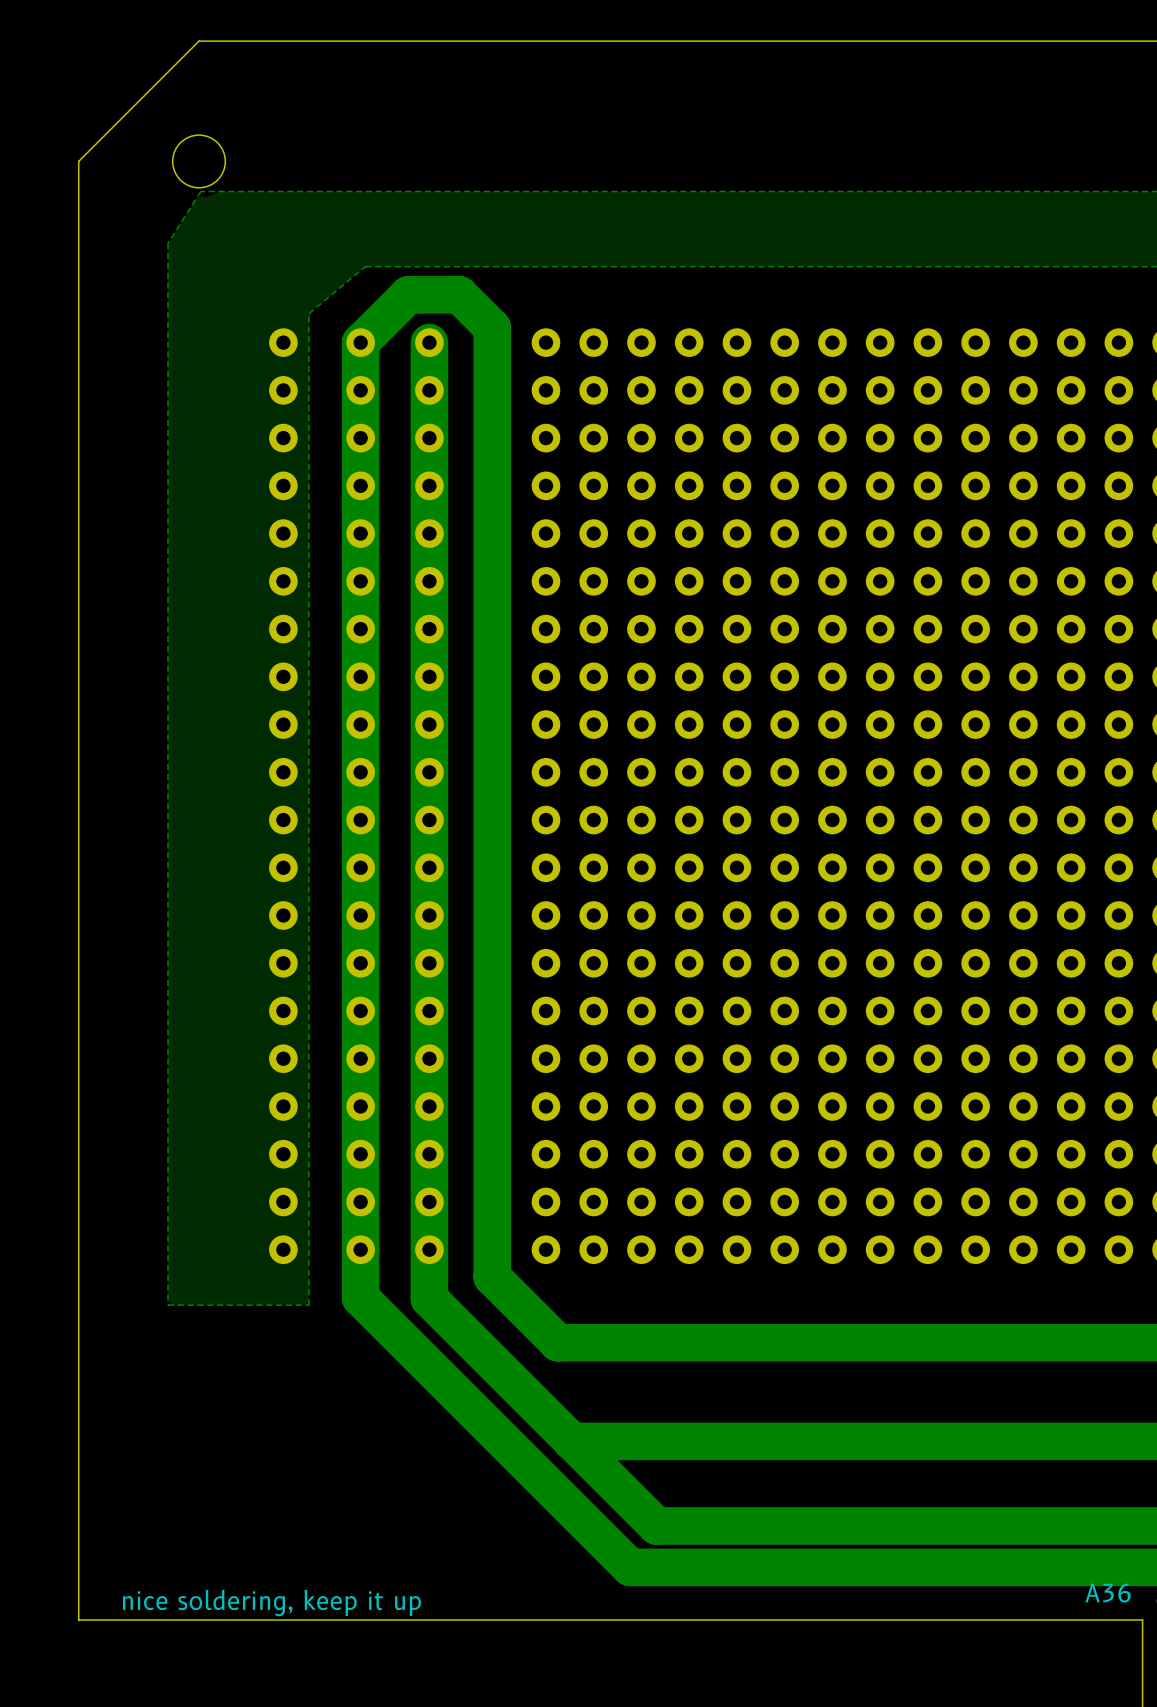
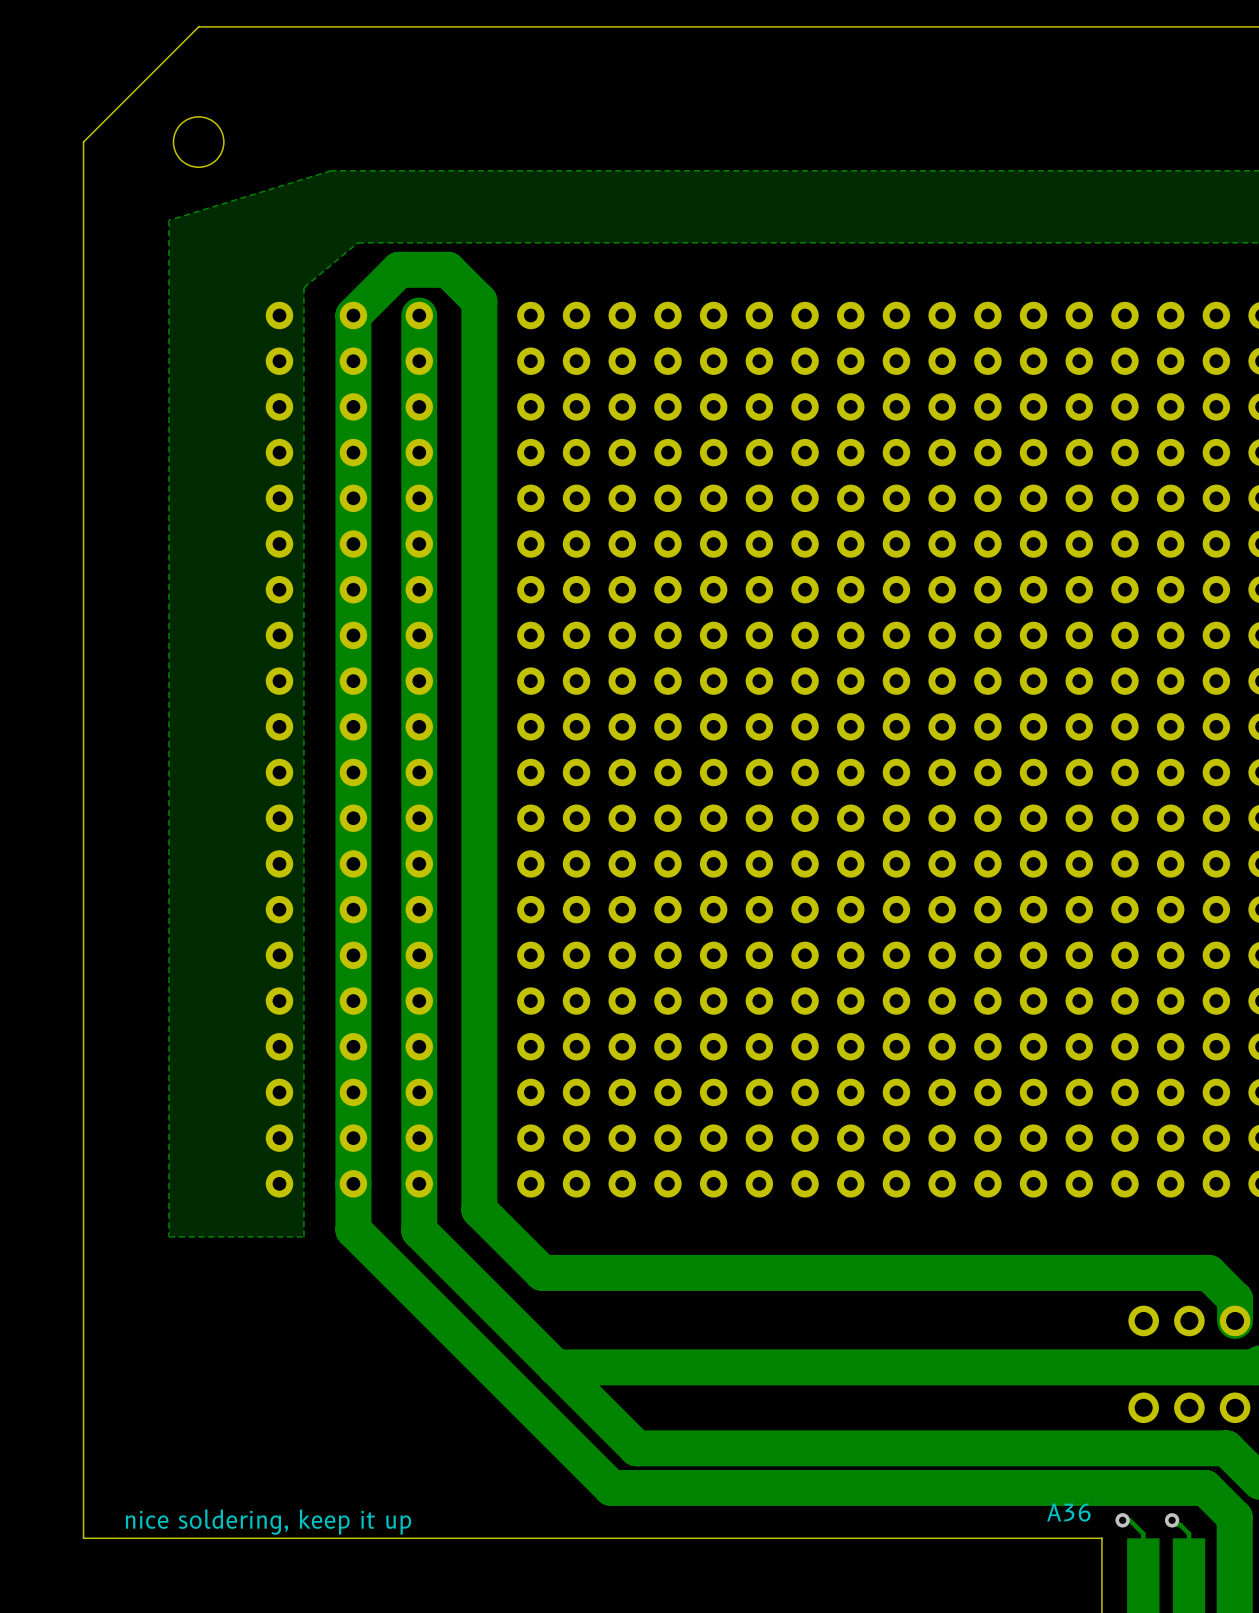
zone outline: (337, 191) (200, 191) (168, 243) -> (330, 170) (169, 220)

